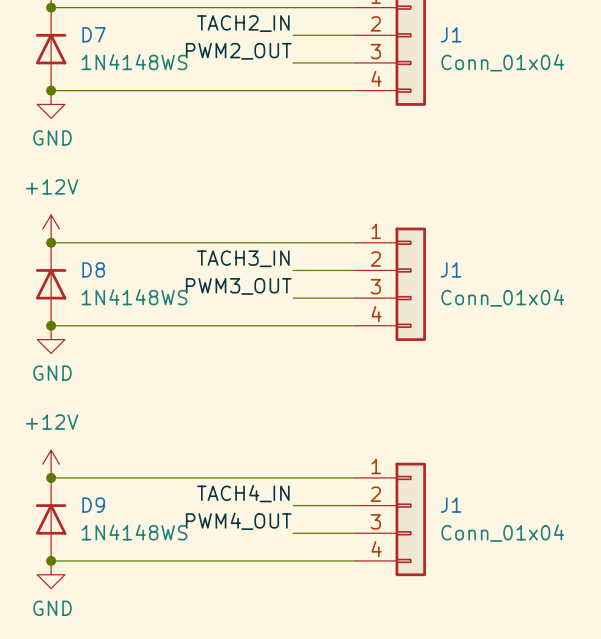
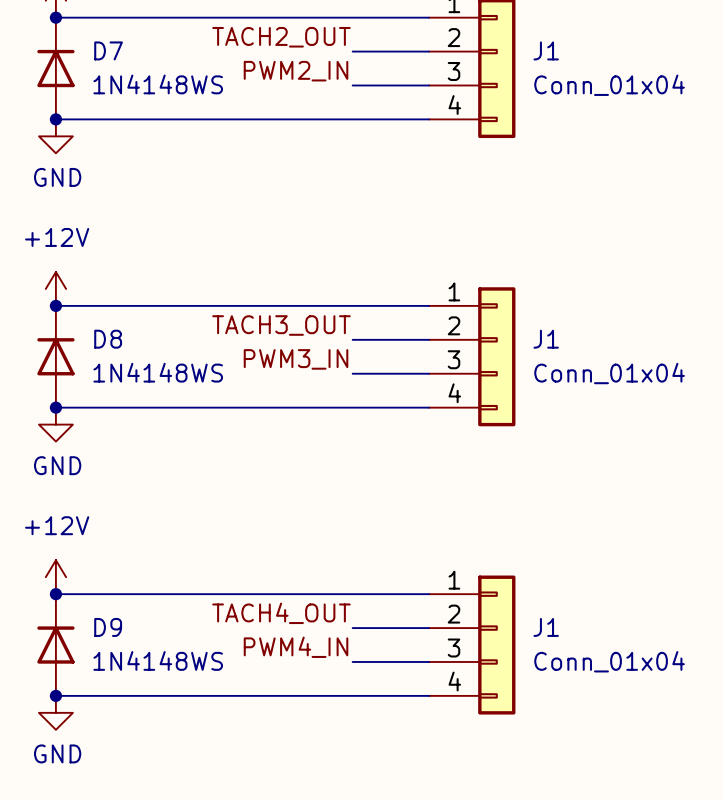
label: TACH2_IN (243, 23) -> TACH2_OUT (281, 37)
label: PWM2_OUT (238, 51) -> PWM2_IN (296, 71)
label: TACH3_IN (243, 258) -> TACH3_OUT (281, 325)
label: PWM3_OUT (238, 286) -> PWM3_IN (296, 359)
label: TACH4_IN (243, 493) -> TACH4_OUT (281, 613)
label: PWM4_OUT (238, 521) -> PWM4_IN (296, 647)

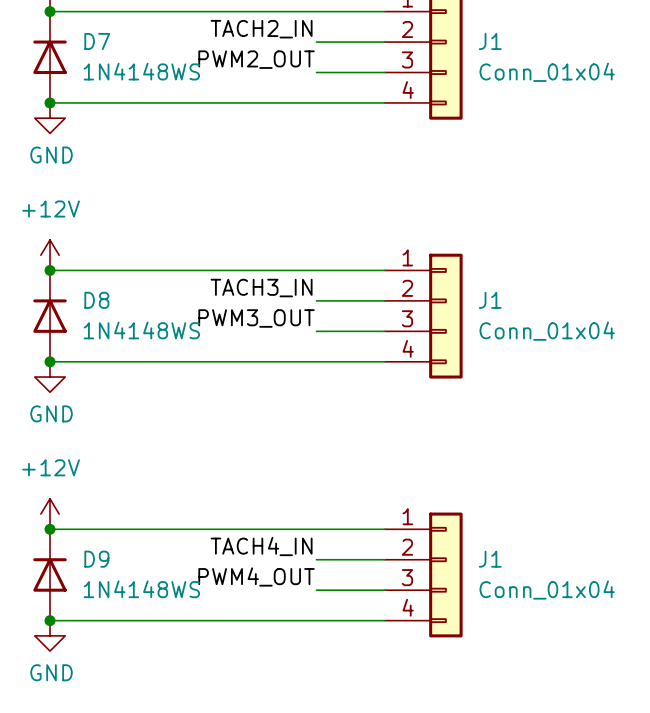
label: TACH2_OUT (281, 37) -> TACH2_IN (261, 29)
label: PWM2_IN (296, 71) -> PWM2_OUT (256, 59)
label: TACH3_OUT (281, 325) -> TACH3_IN (261, 288)
label: PWM3_IN (296, 359) -> PWM3_OUT (256, 318)
label: TACH4_OUT (281, 613) -> TACH4_IN (261, 546)
label: PWM4_IN (296, 647) -> PWM4_OUT (256, 576)

